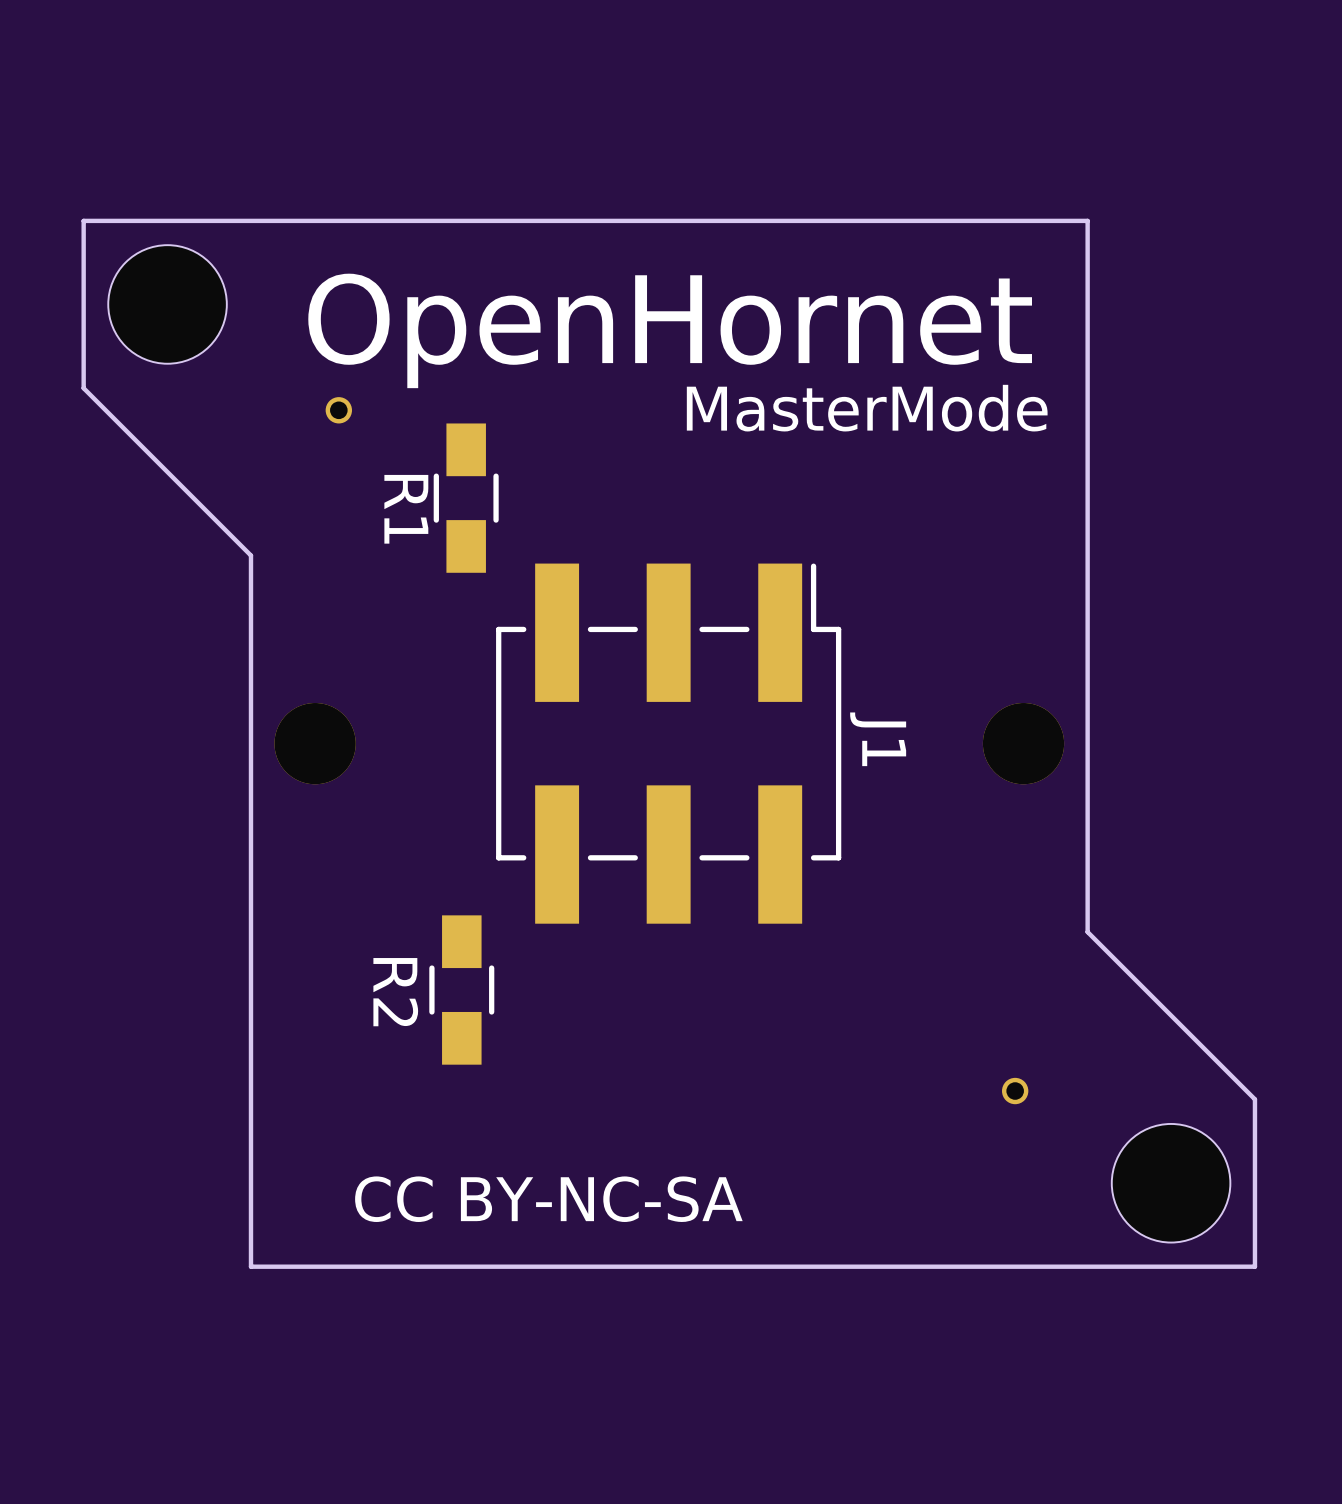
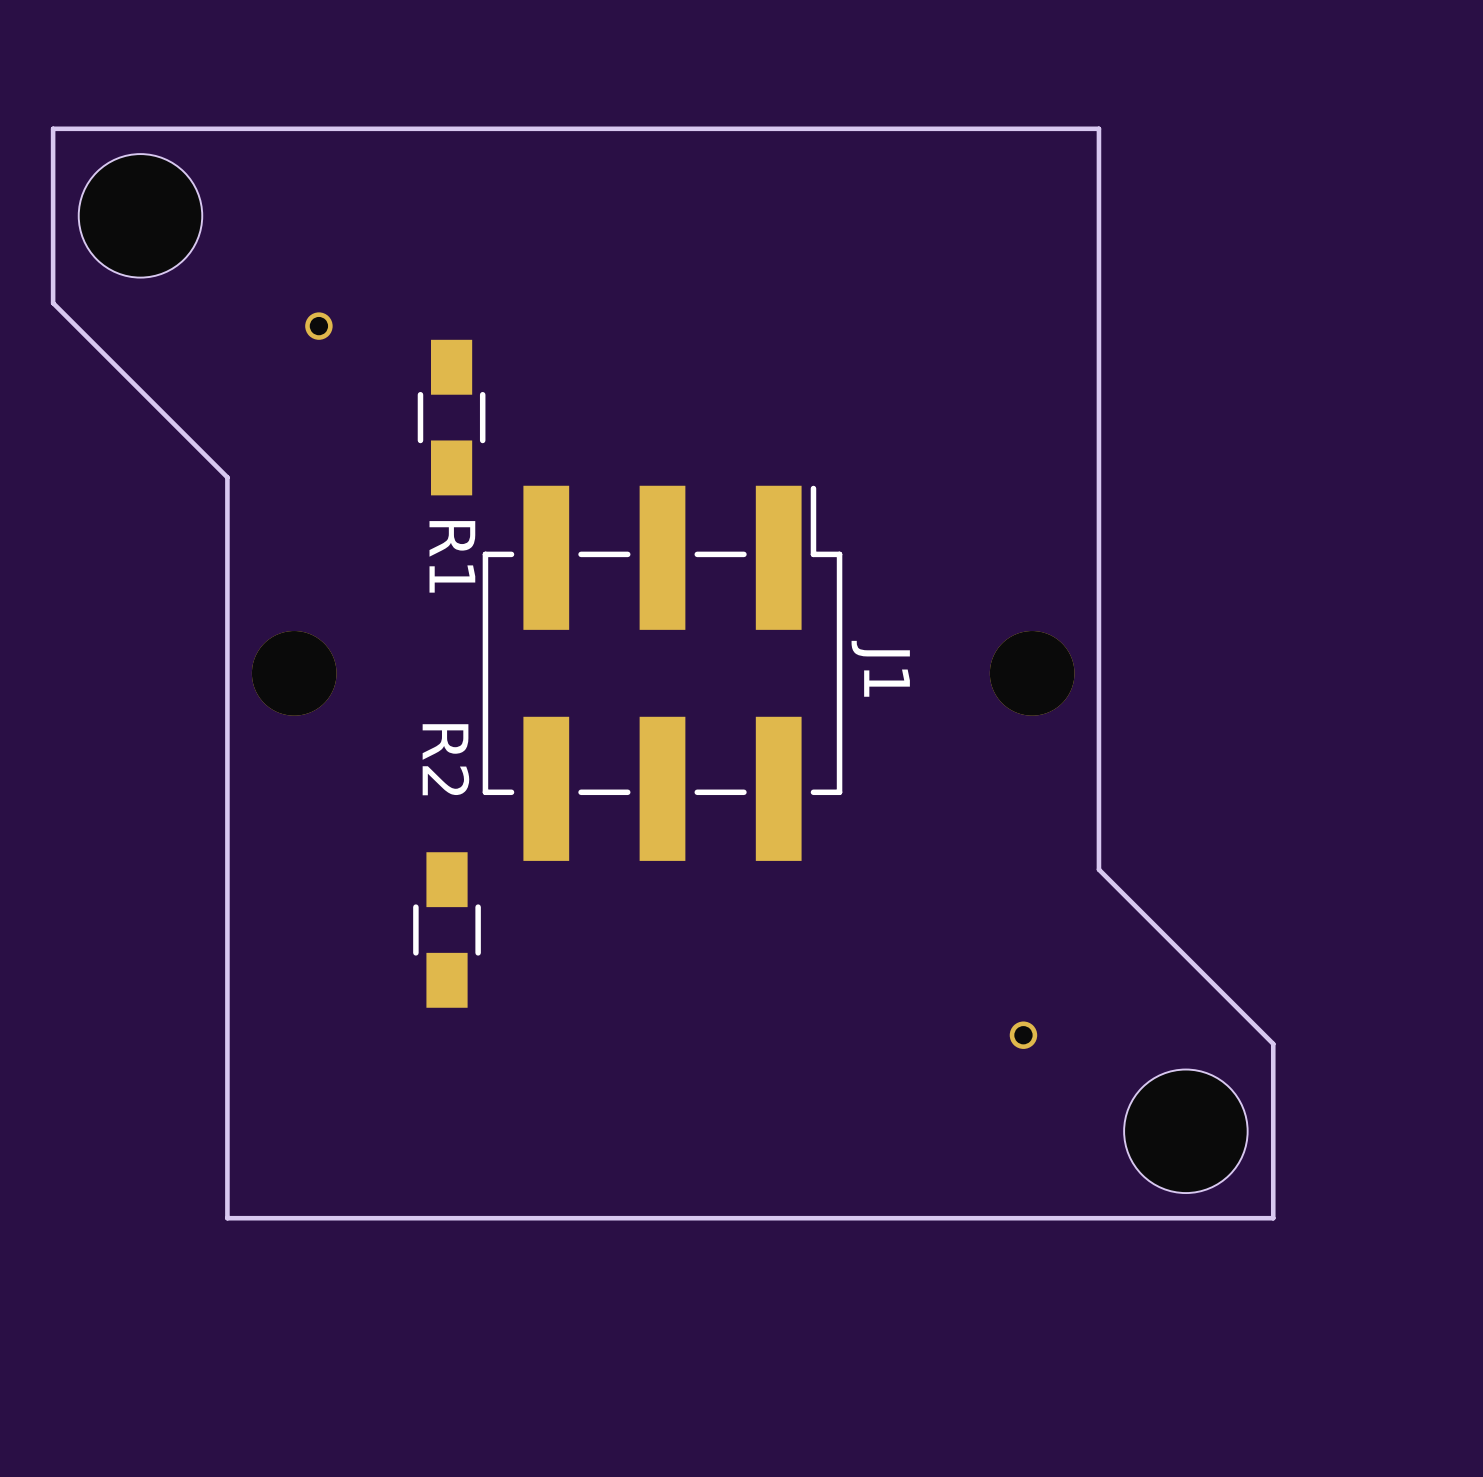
text: OpenHornet (670, 330) -> none
text: MasterMode (867, 408) -> none
R1 name position: R1 (406, 509) -> R1 (452, 556)
R2 name position: R2 (395, 992) -> R2 (445, 759)
text: CC BY-NC-SA (548, 1199) -> none

